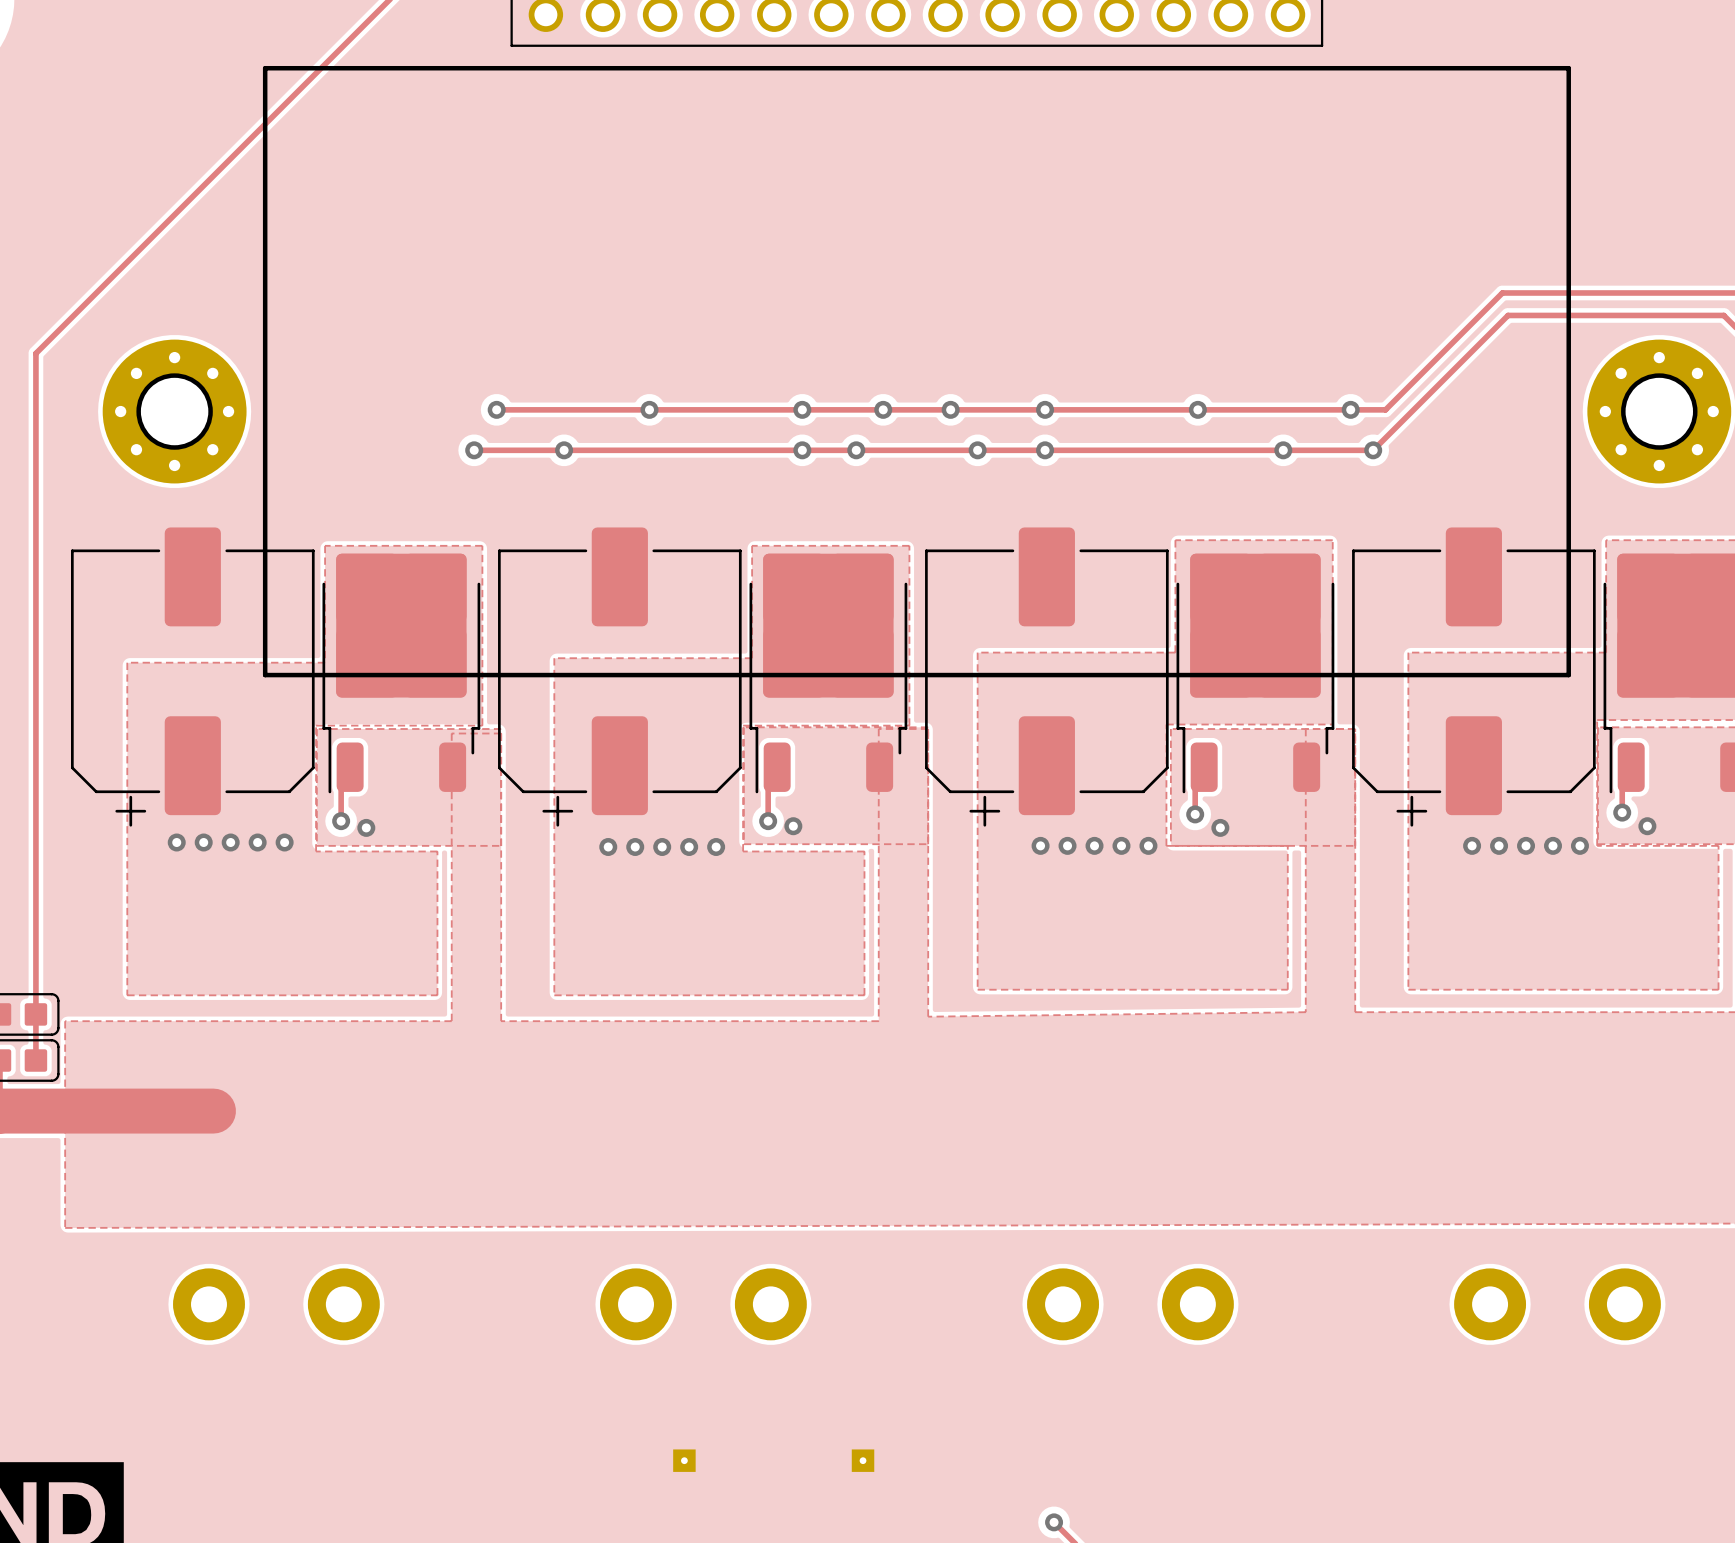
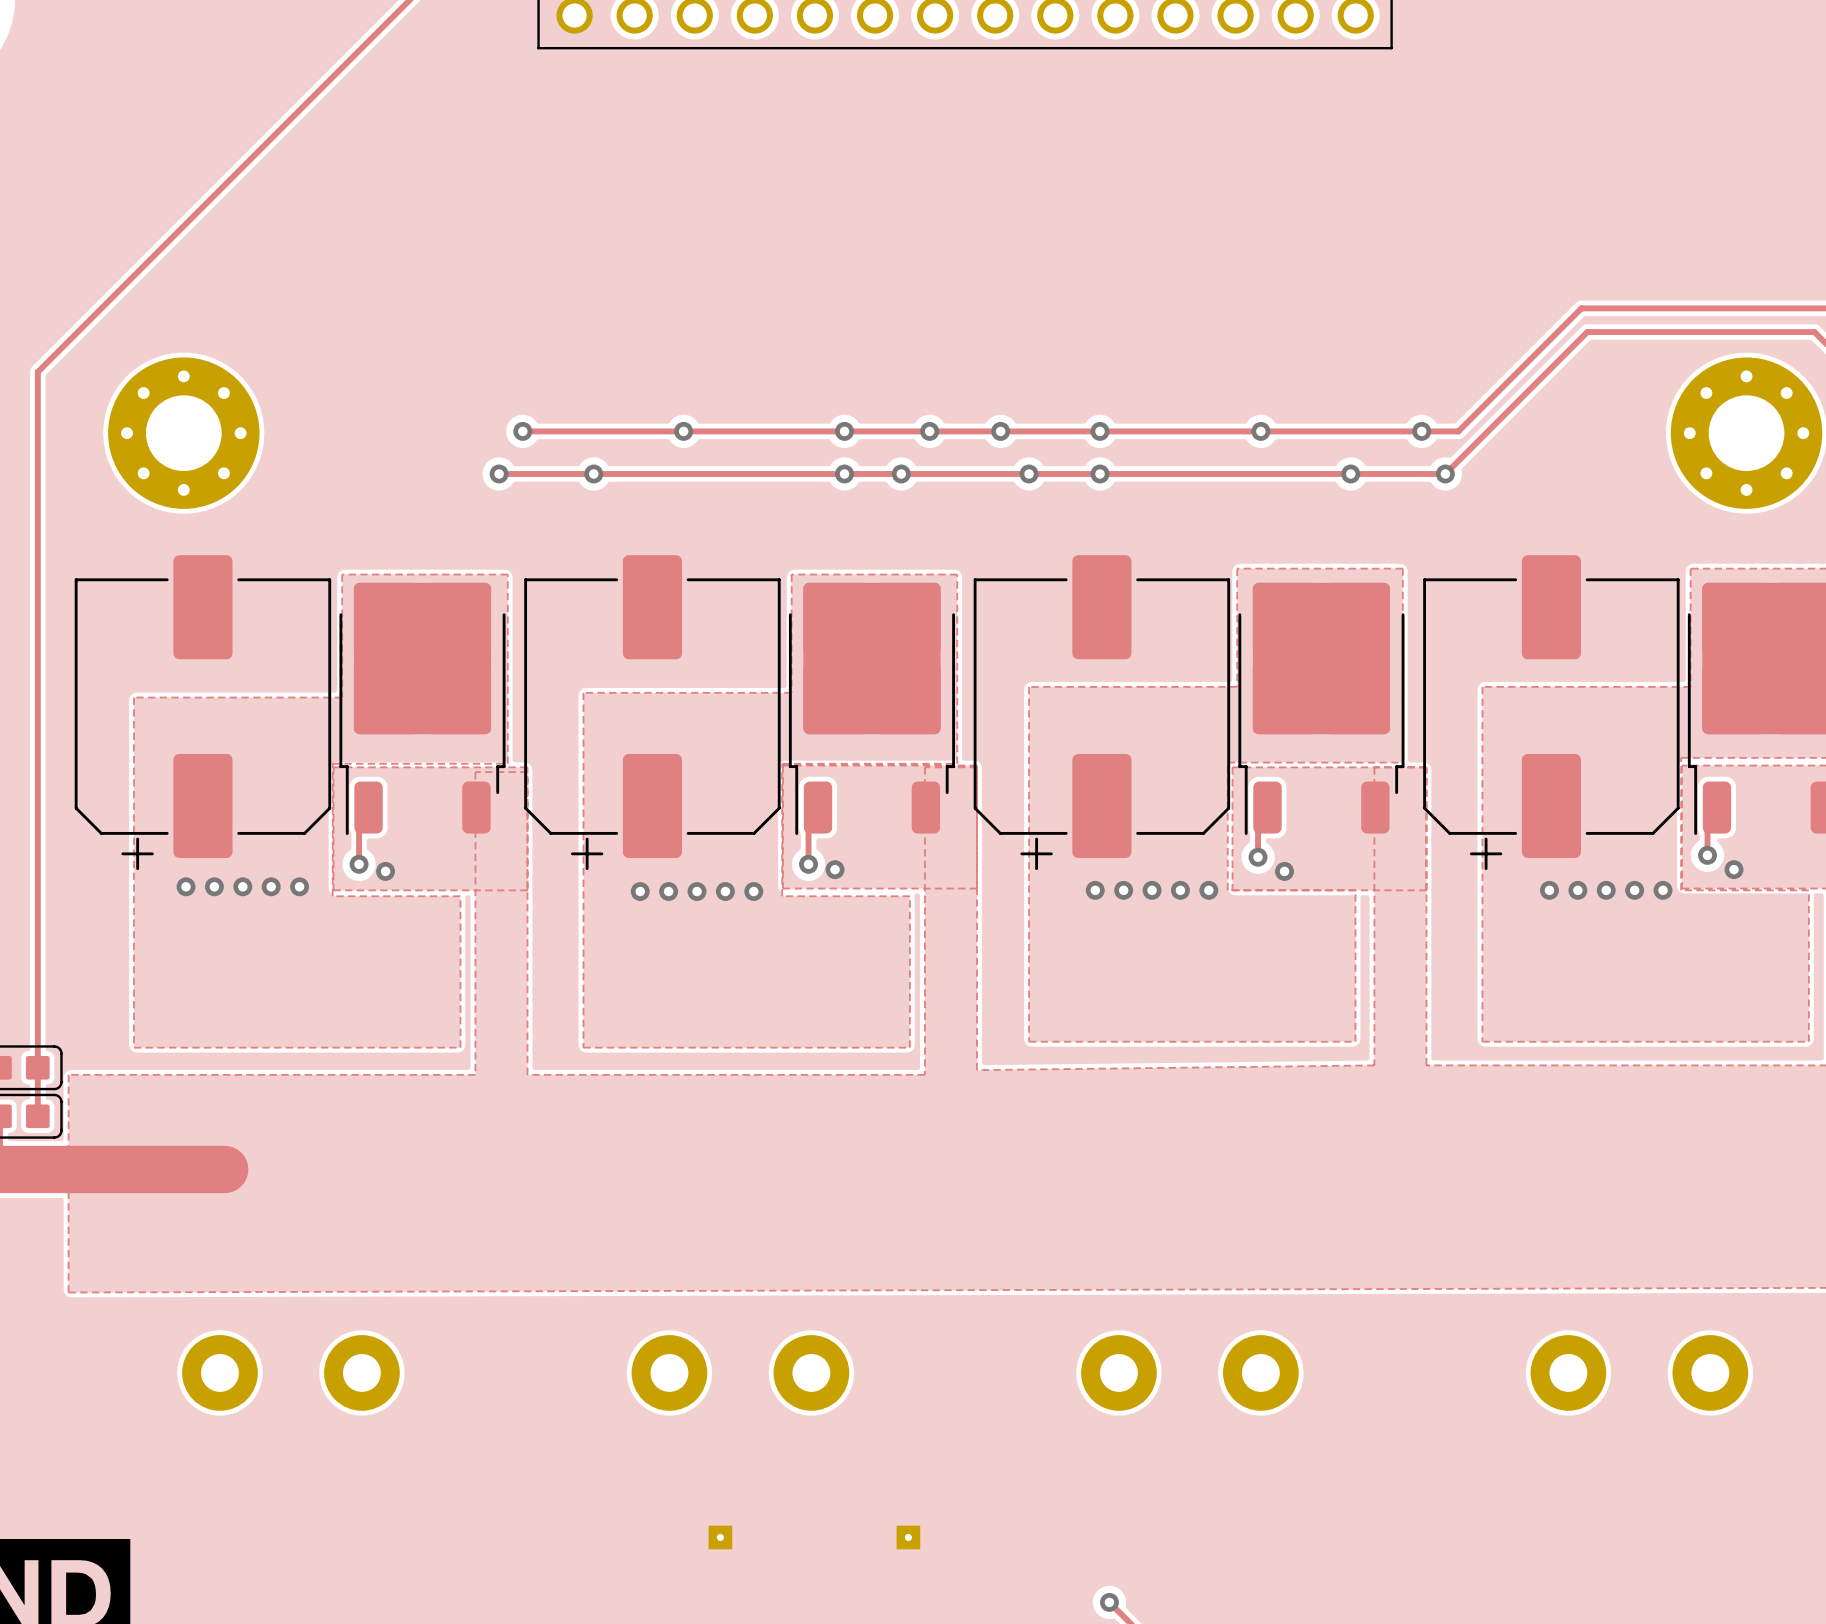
board edge: (265, 68) (1568, 68) (1568, 675) (265, 675) (265, 68) -> none
round board edge: [136, 373, 213, 450] -> none
round board edge: [1621, 373, 1698, 450] -> none

